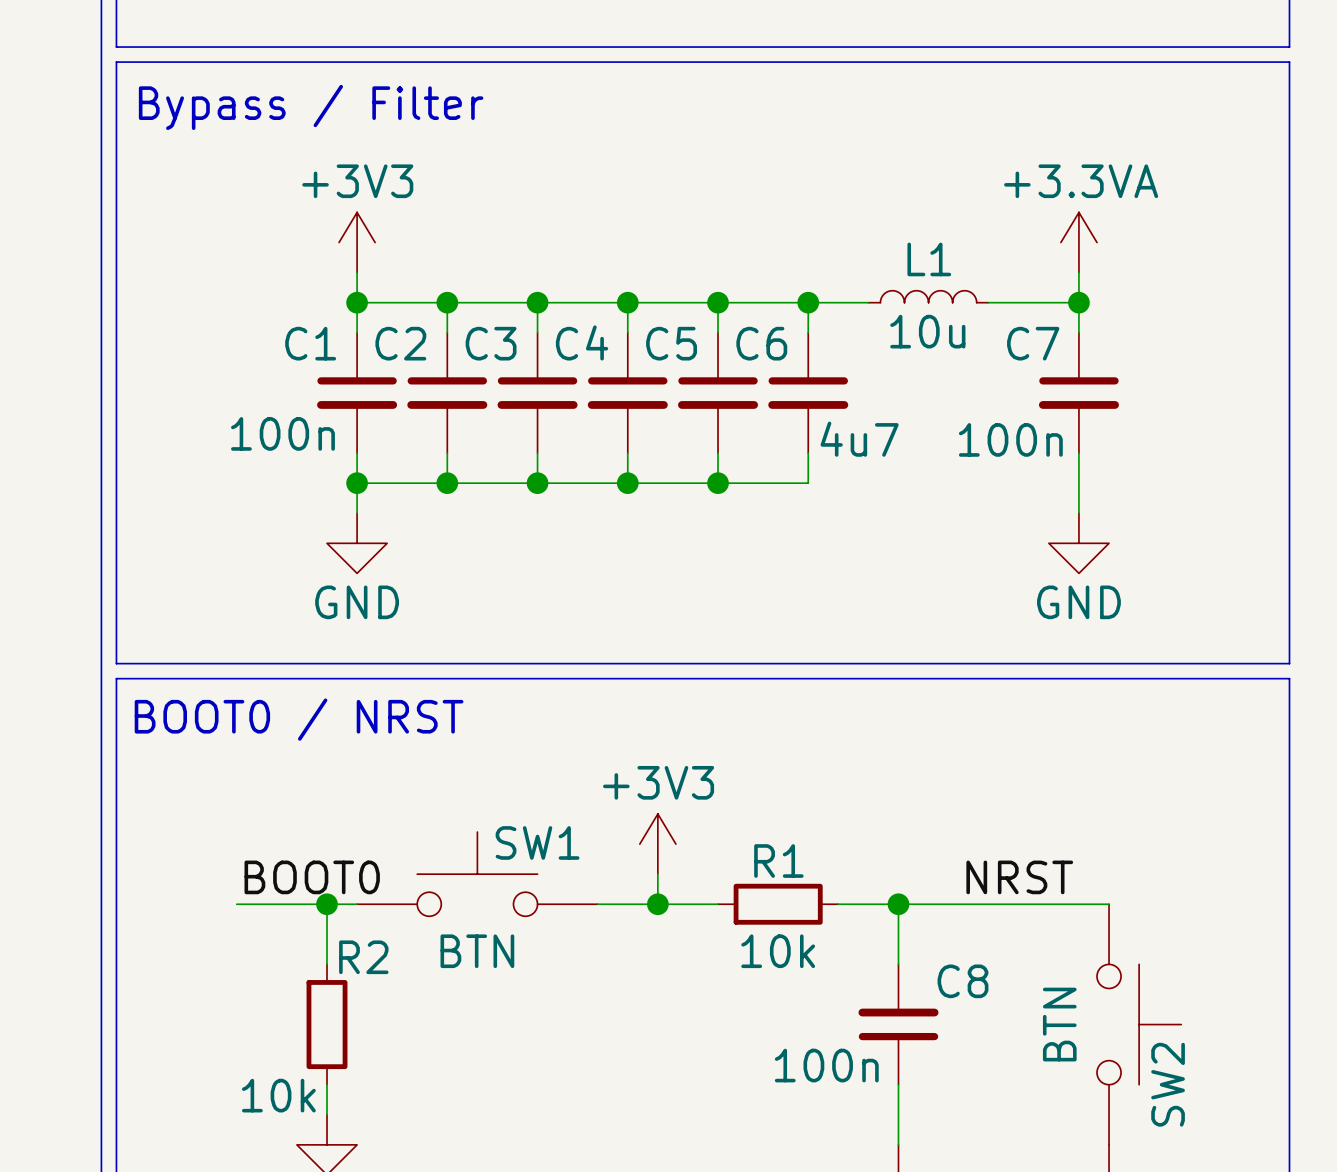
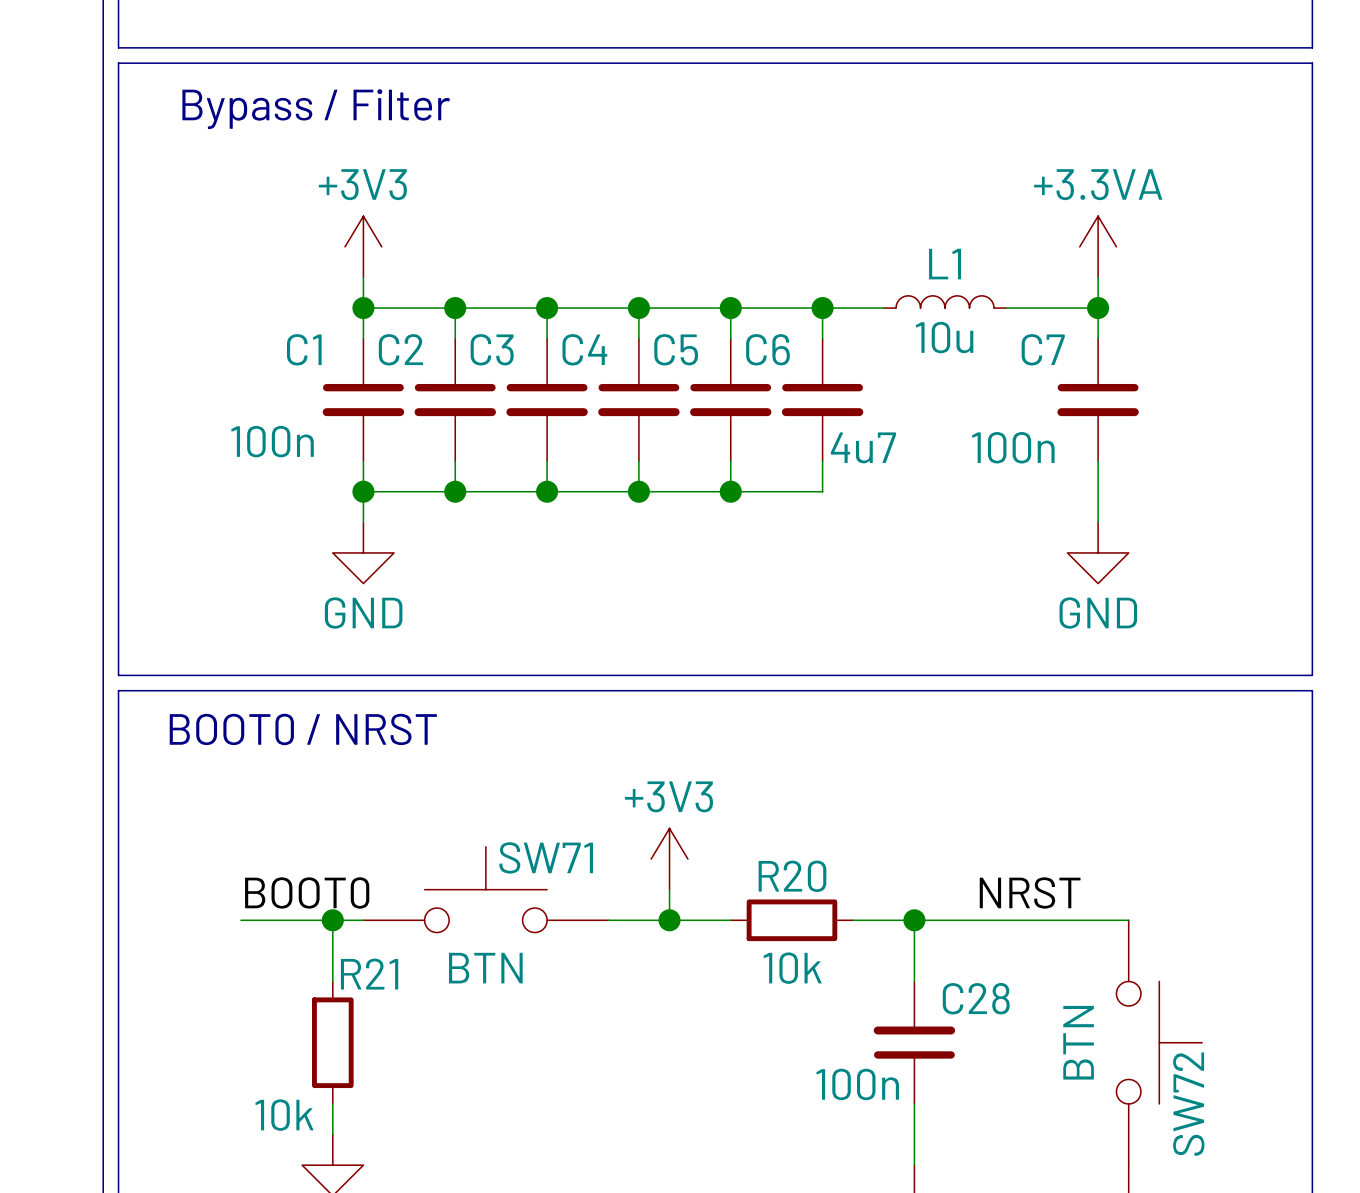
SW1 name: SW1 (537, 842) -> SW71 (546, 857)
R1 name: R1 (778, 861) -> R20 (792, 876)
R2 name: R2 (363, 957) -> R21 (369, 974)
C8 name: C8 (963, 981) -> C28 (976, 998)
SW2 name: SW2 (1168, 1084) -> SW72 (1188, 1104)

